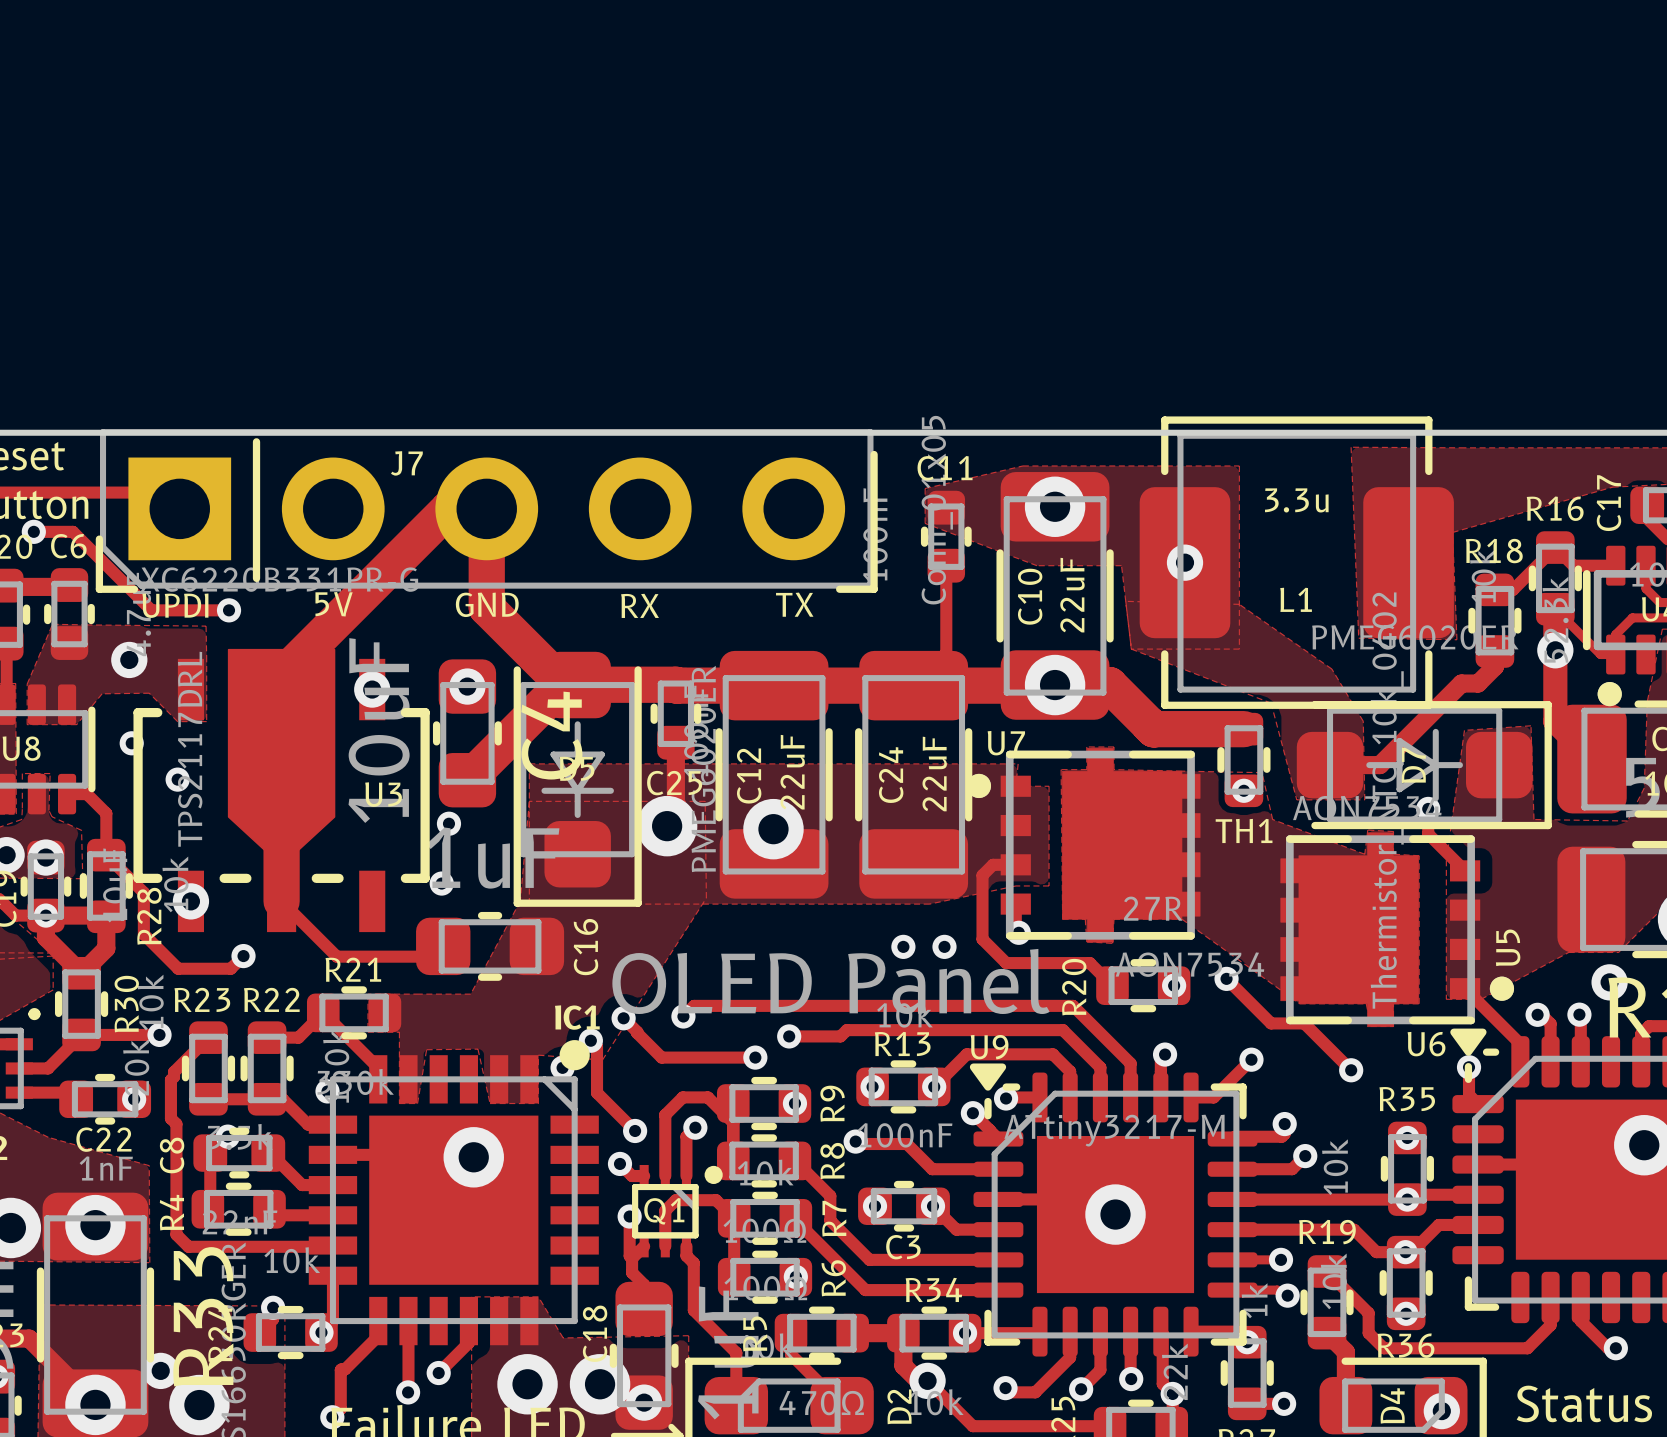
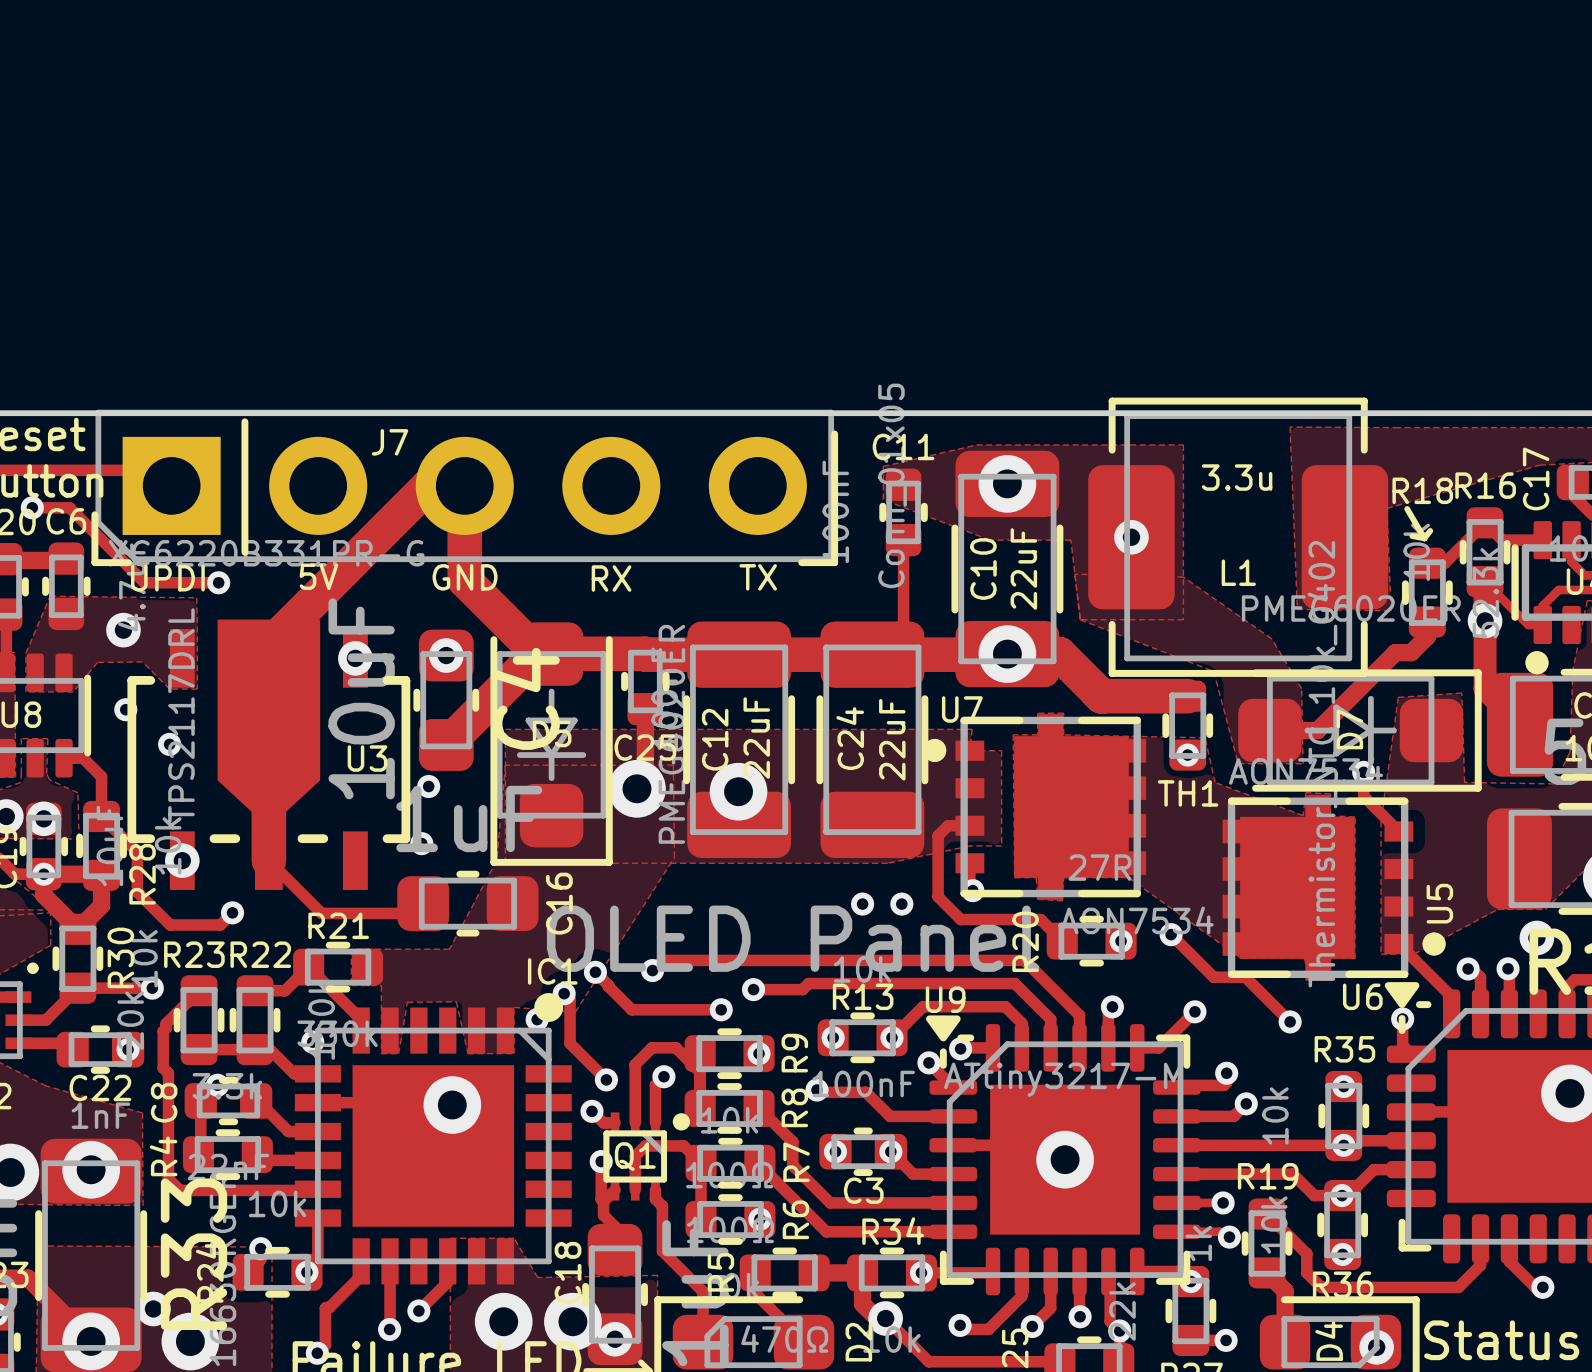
line: none -> (1407, 508) (1424, 538)
R18 name position: R18 (1494, 551) -> R18 (1422, 490)
line: none -> (1430, 530) (1424, 538)
line: none -> (1412, 536) (1424, 538)

